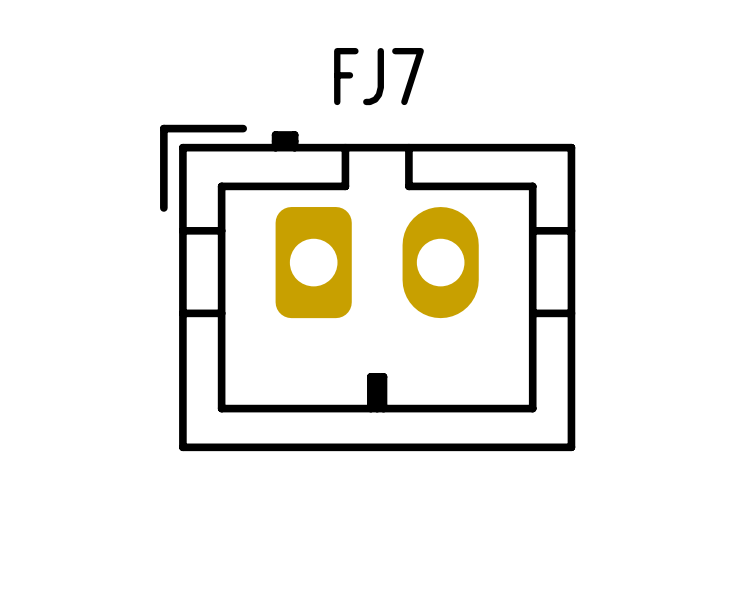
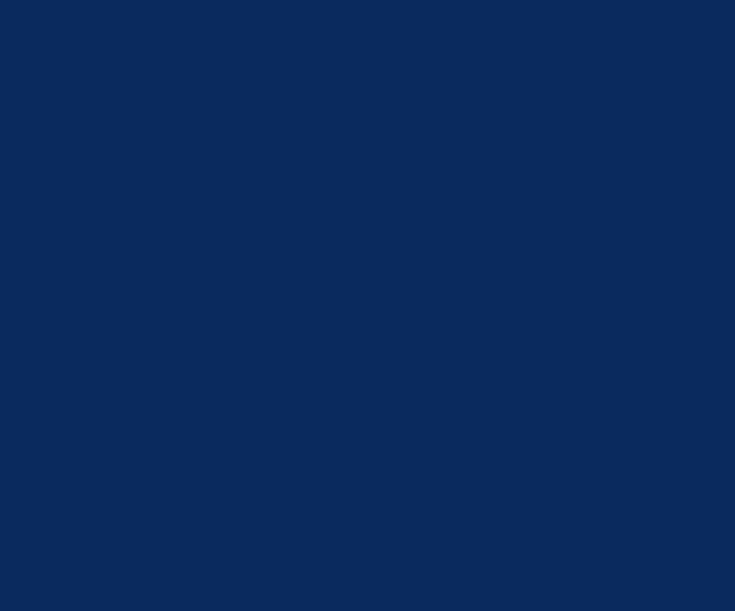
FJ7: (367, 287) -> none

